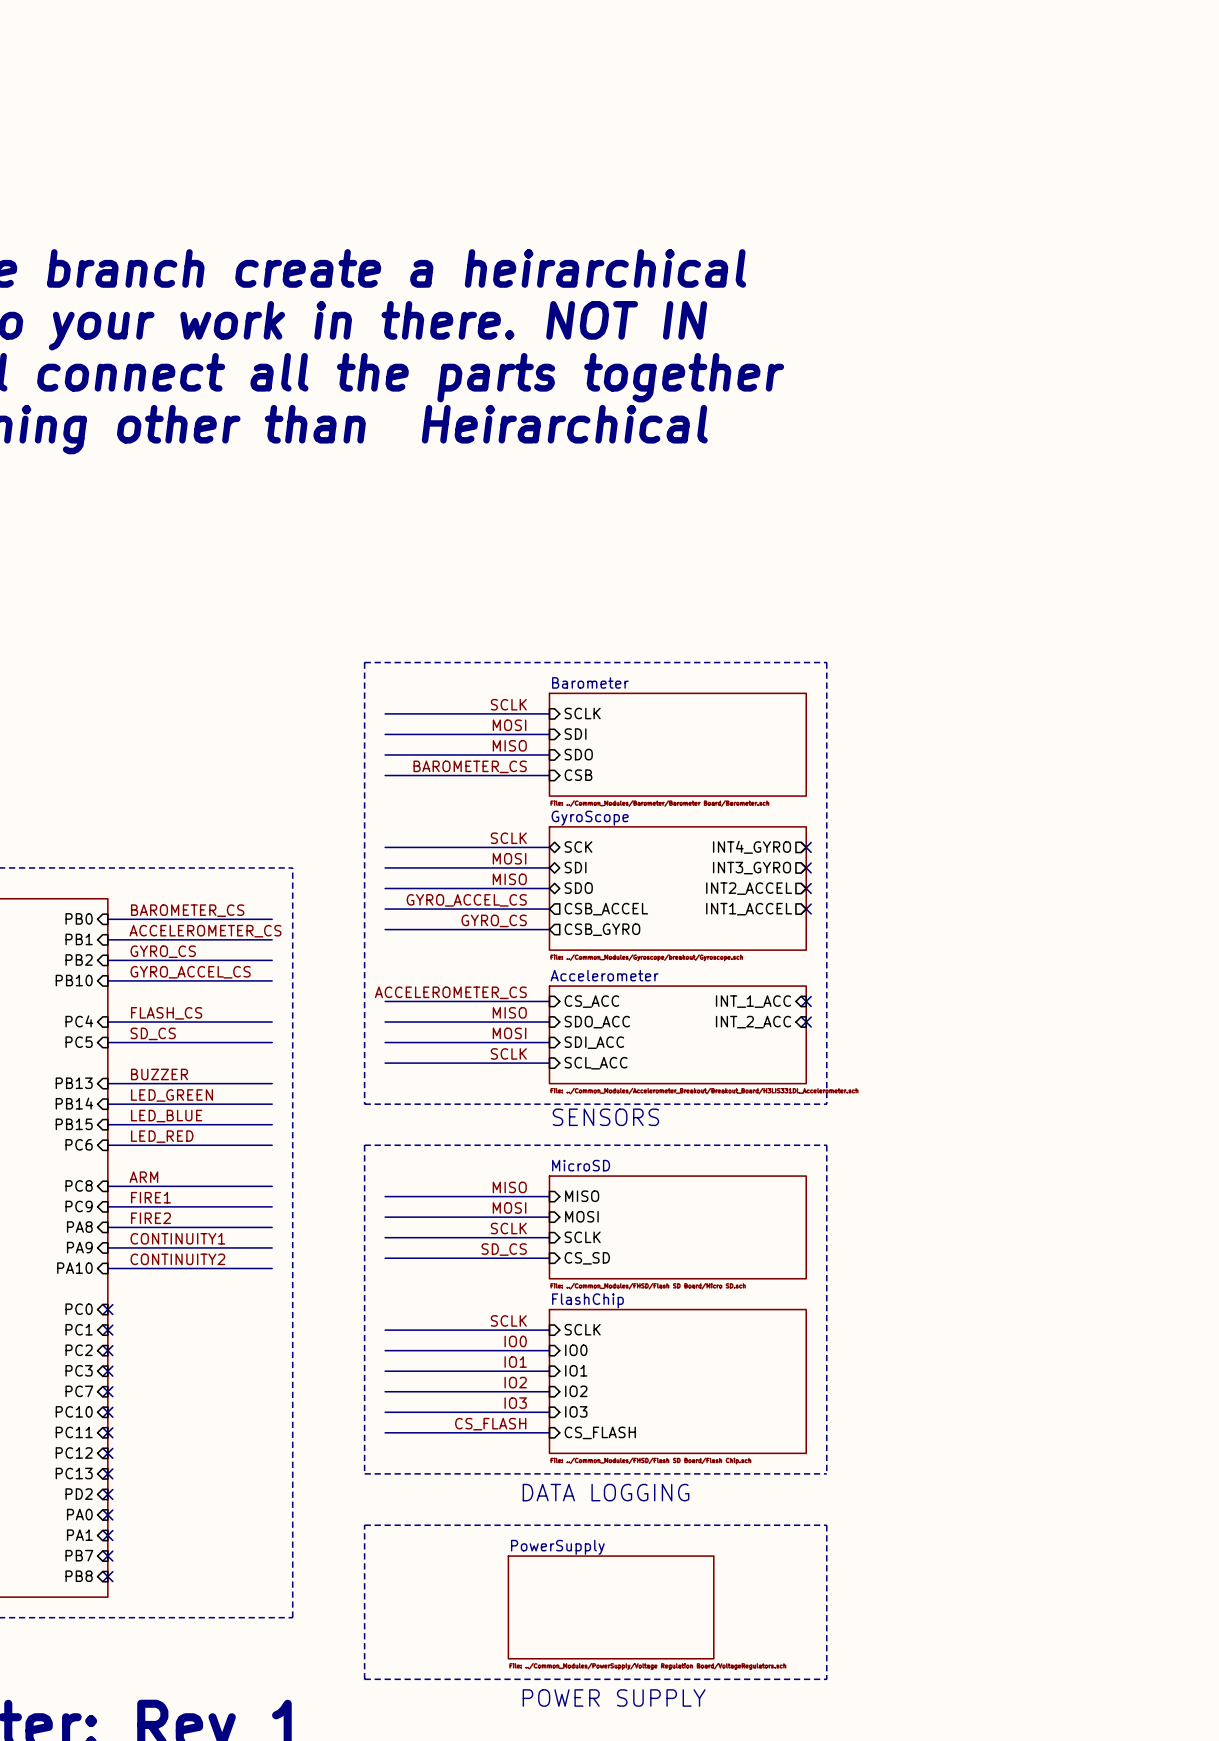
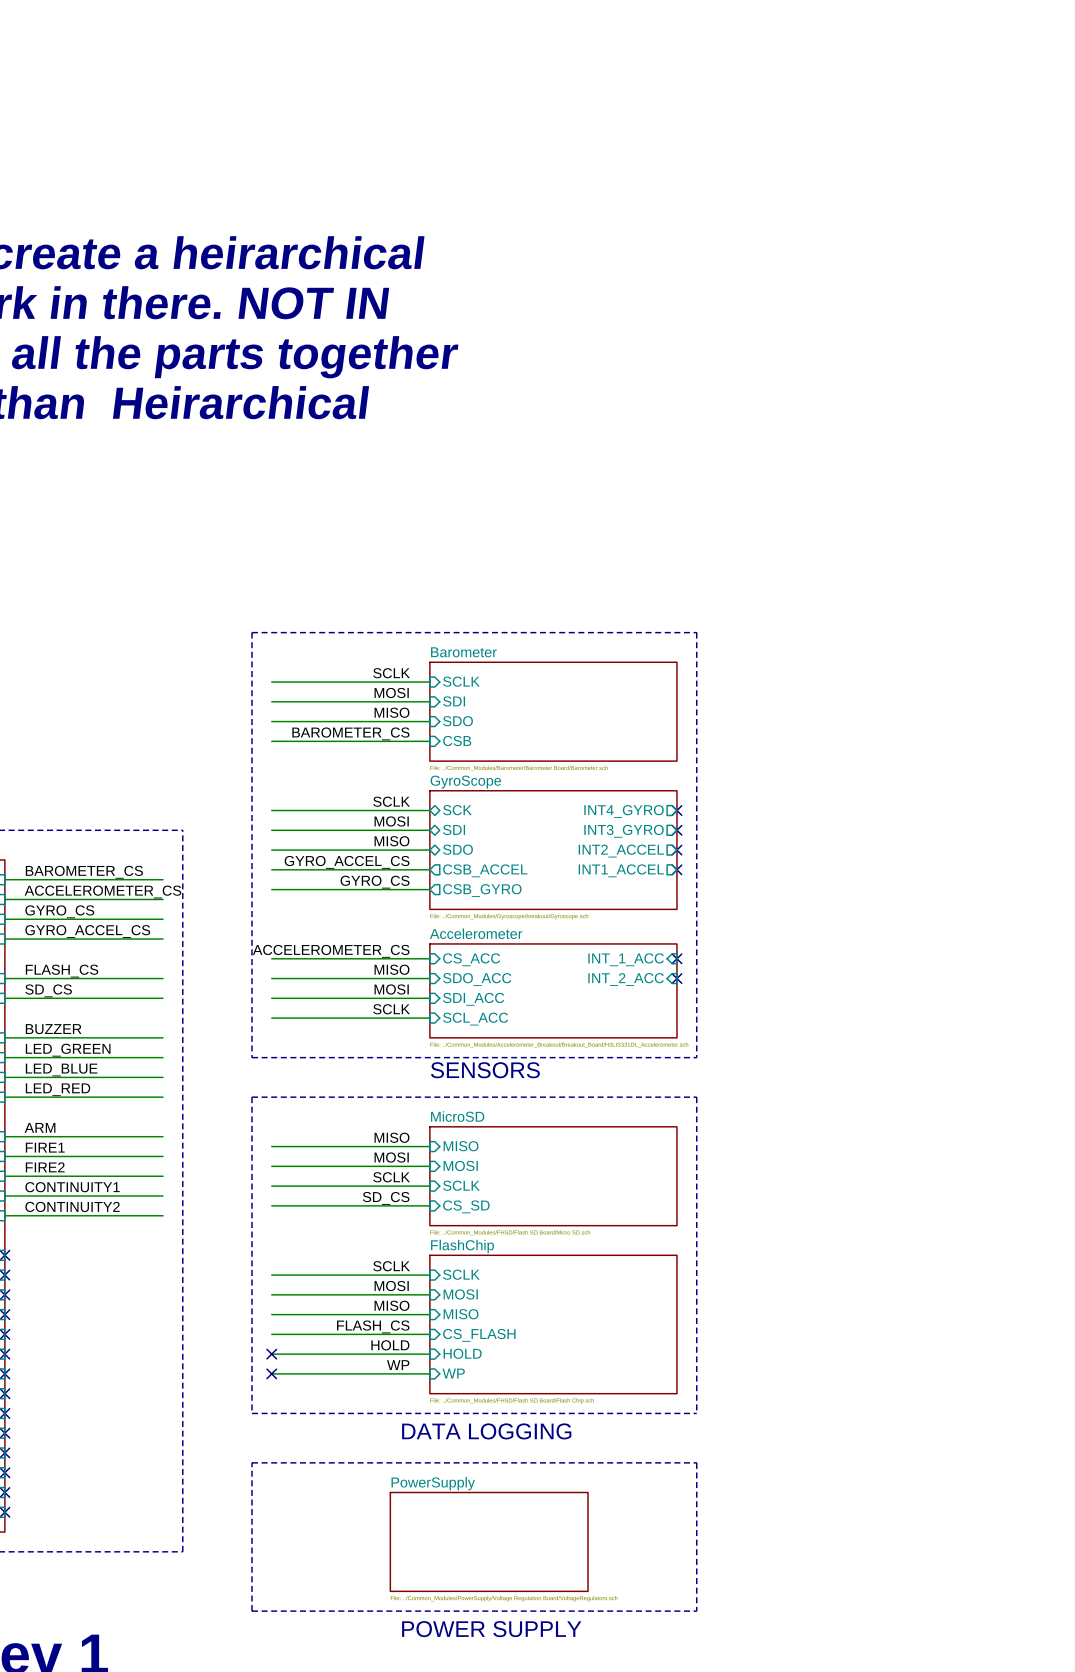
label: IO0 (515, 1341) -> MOSI (391, 1286)
sheet pin: IO0 (576, 1350) -> MOSI (460, 1294)
label: IO1 (515, 1362) -> MISO (392, 1305)
sheet pin: IO1 (576, 1370) -> MISO (461, 1314)
label: IO2 (515, 1382) -> FLASH_CS (373, 1326)
sheet pin: IO2 (576, 1391) -> CS_FLASH (479, 1335)
label: IO3 (515, 1403) -> HOLD (390, 1345)
sheet pin: IO3 (576, 1411) -> HOLD (462, 1353)
no-connect mark: none -> (271, 1354)
label: CS_FLASH (490, 1424) -> WP (398, 1365)
no-connect mark: none -> (271, 1373)
sheet pin: CS_FLASH (600, 1432) -> WP (453, 1373)

